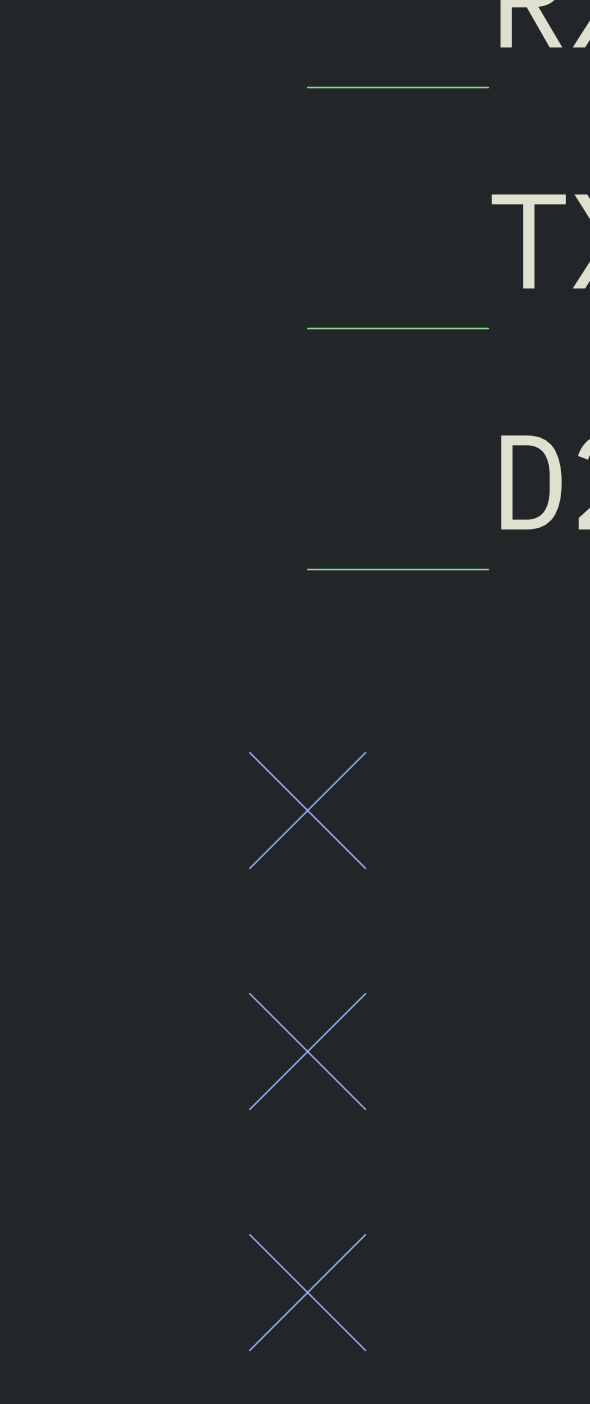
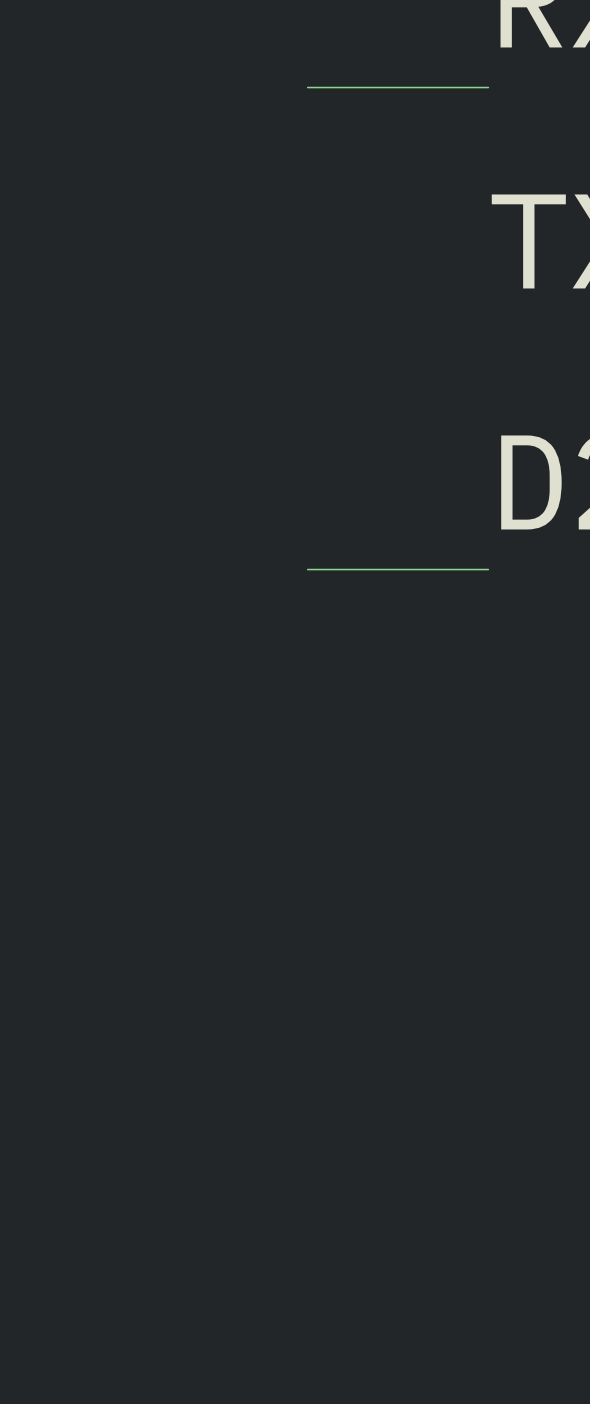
wire: (307, 328) (488, 328) -> none
no-connect mark: (307, 810) -> none
no-connect mark: (307, 1051) -> none
no-connect mark: (307, 1292) -> none

